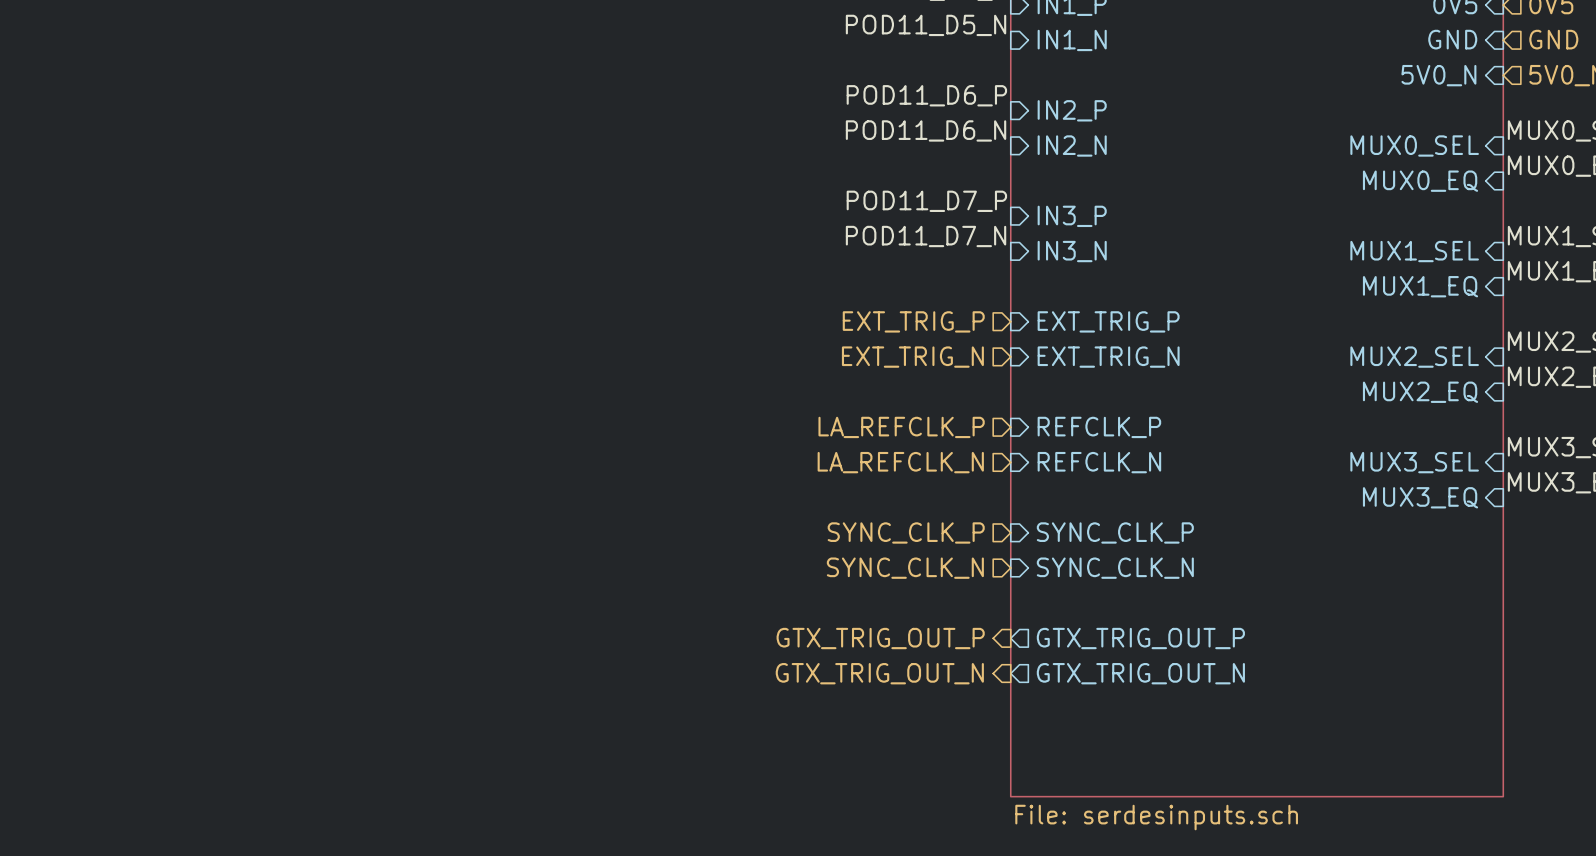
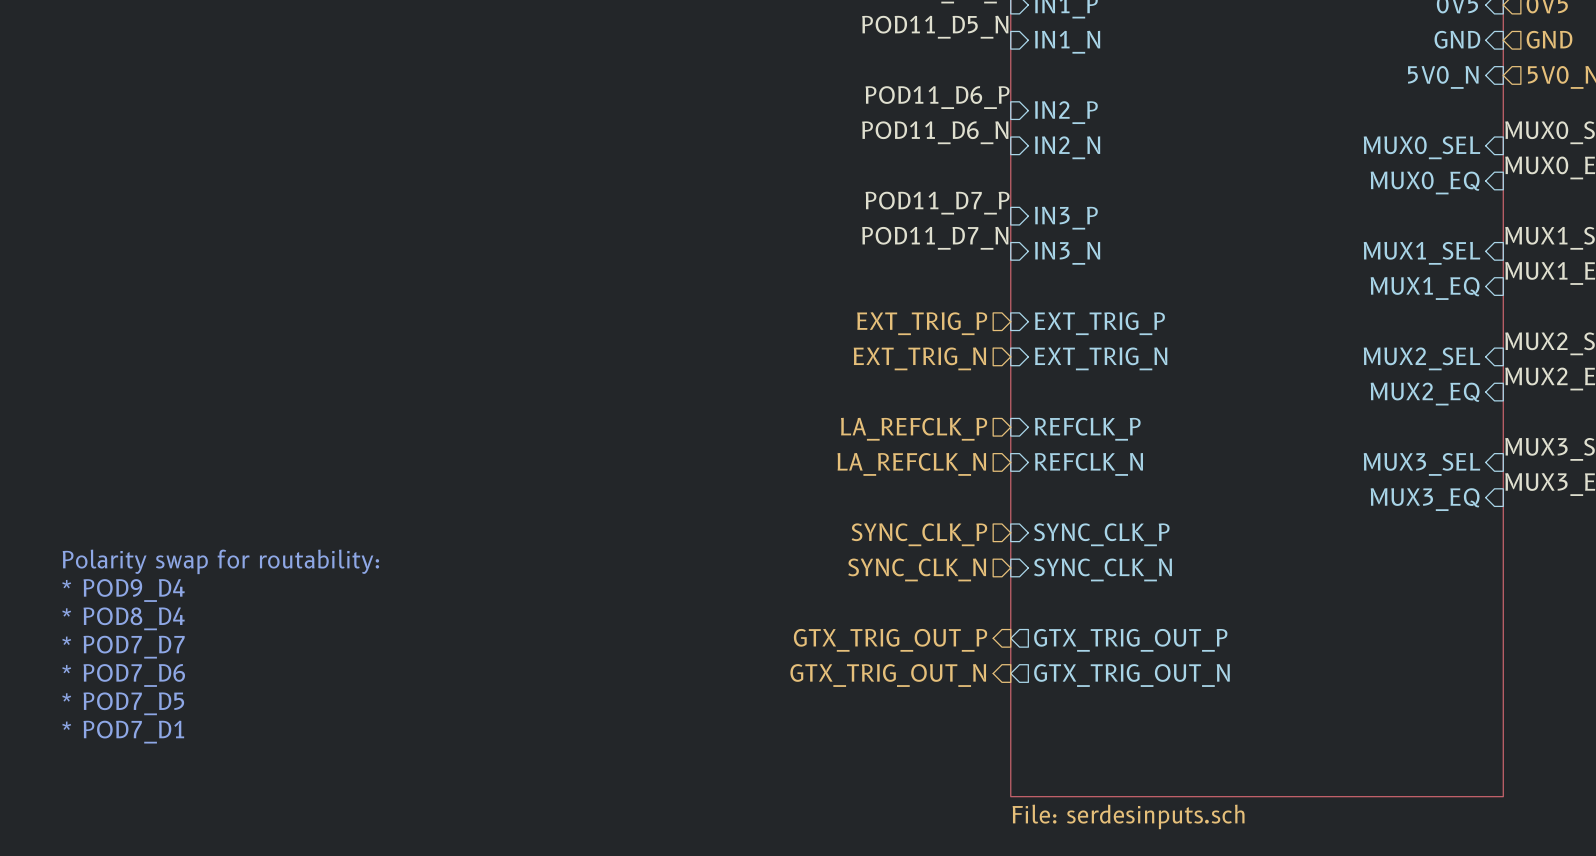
text: none -> Polarity swap for routability: (220, 561)
text: none -> * POD9_D4 (123, 590)
text: none -> * POD8_D4 (123, 618)
text: none -> * POD7_D7 (123, 647)
text: none -> * POD7_D6 (123, 675)
text: none -> * POD7_D5 (123, 703)
text: none -> * POD7_D1 (123, 732)

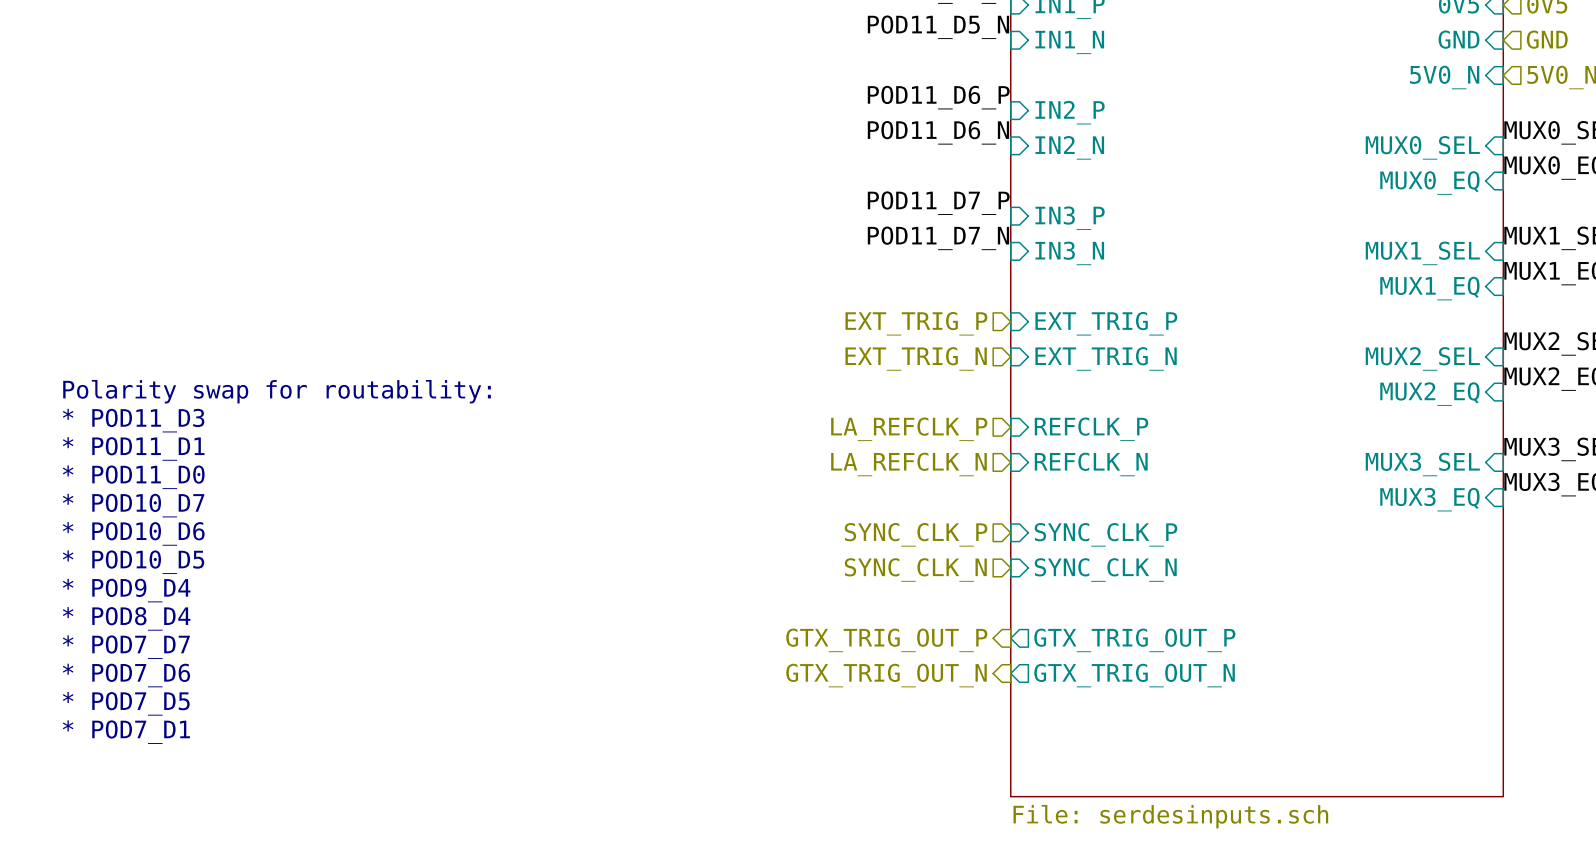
text: none -> Polarity swap for routability: (277, 391)
text: none -> * POD11_D3 (133, 420)
text: none -> * POD11_D1 (133, 448)
text: none -> * POD11_D0 (133, 477)
text: none -> * POD10_D7 (133, 505)
text: none -> * POD10_D6 (133, 533)
text: Polarity swap for routability: (220, 561) -> * POD10_D5 (133, 562)

